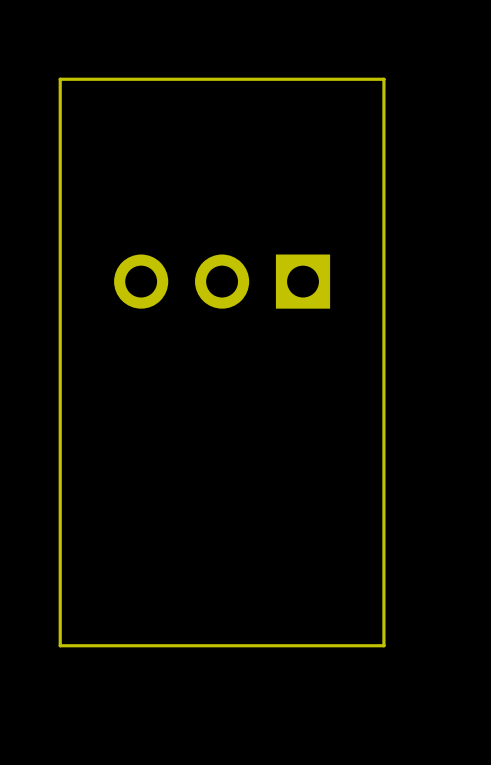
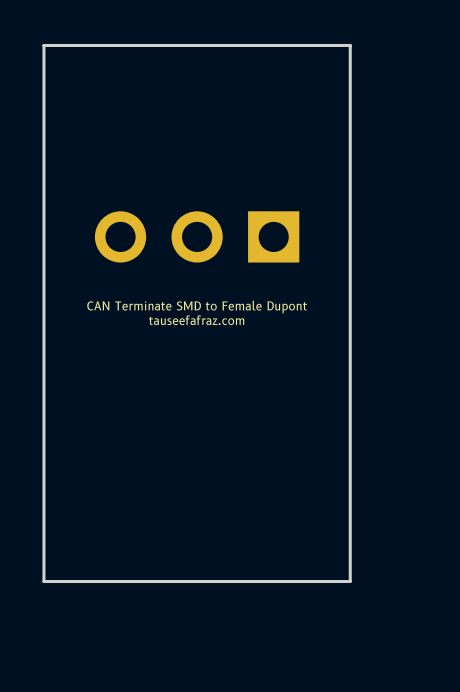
text: none -> CAN Terminate SMD to Female Dupont (197, 307)
text: none -> tauseefafraz.com (196, 320)

